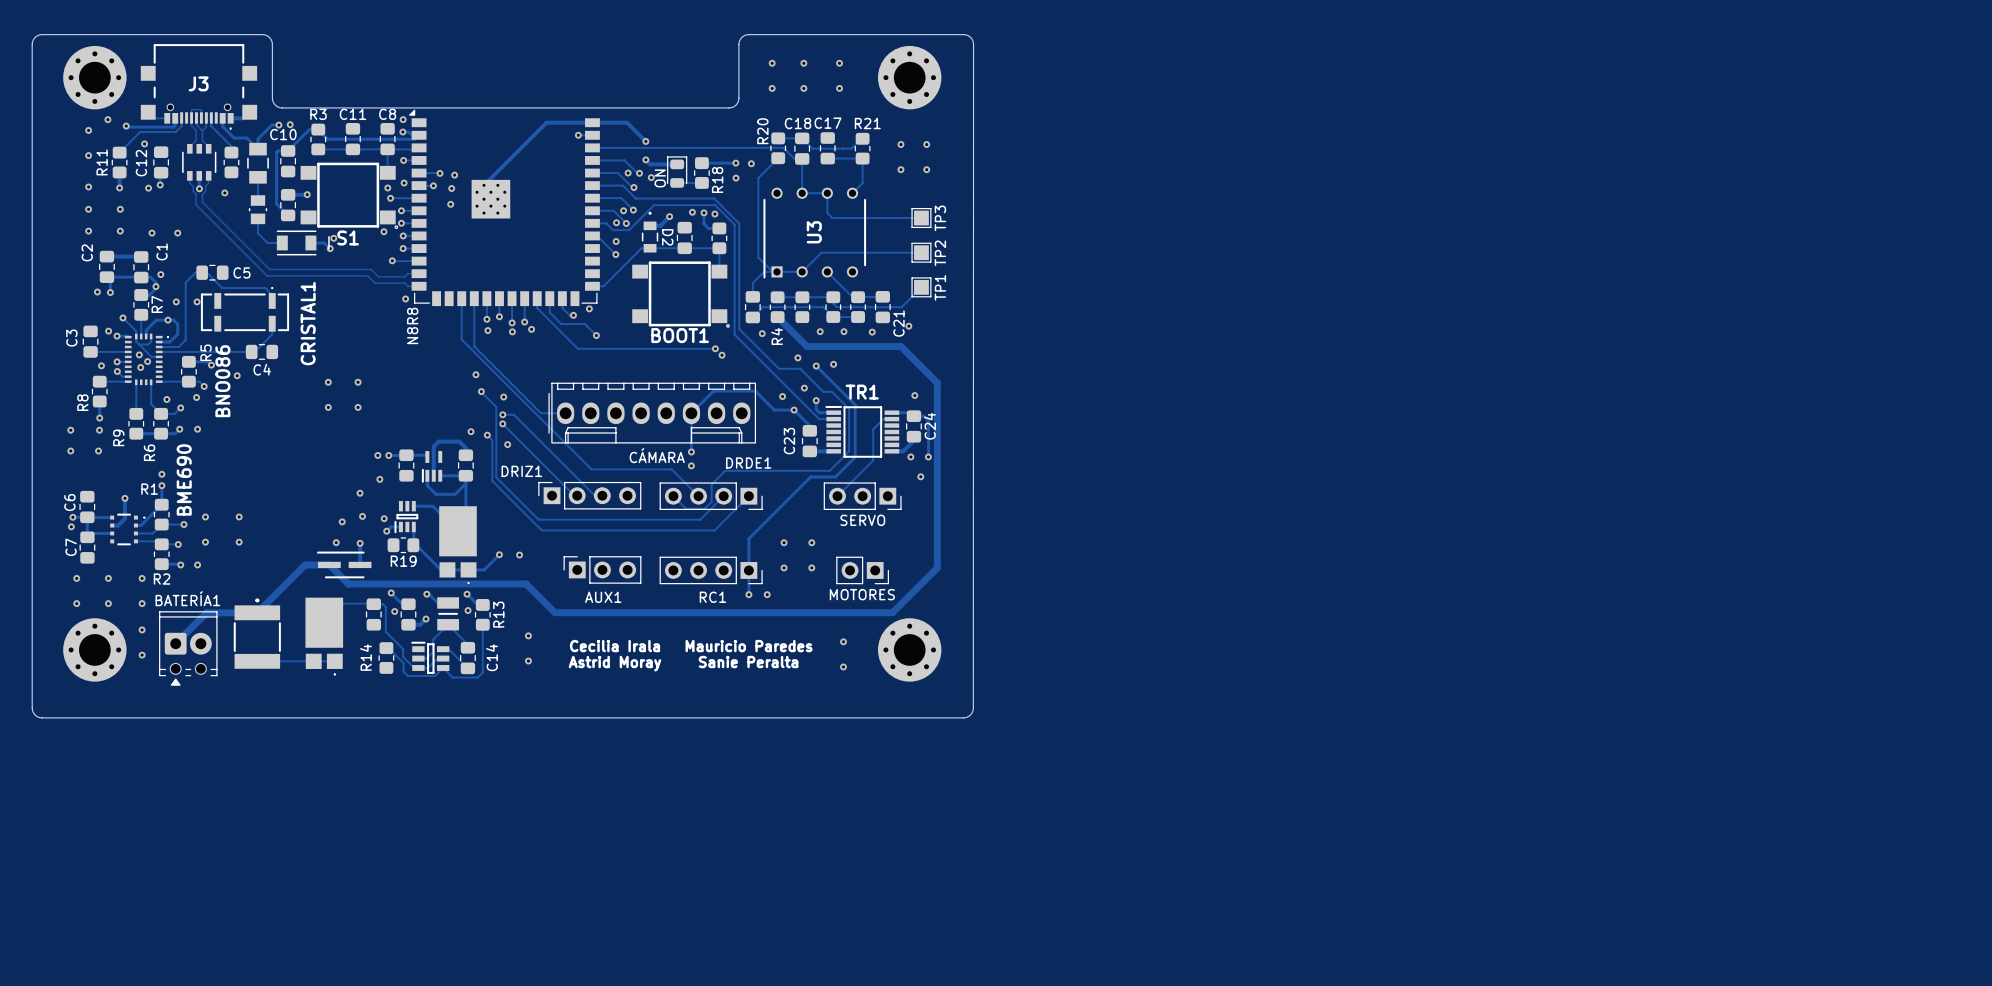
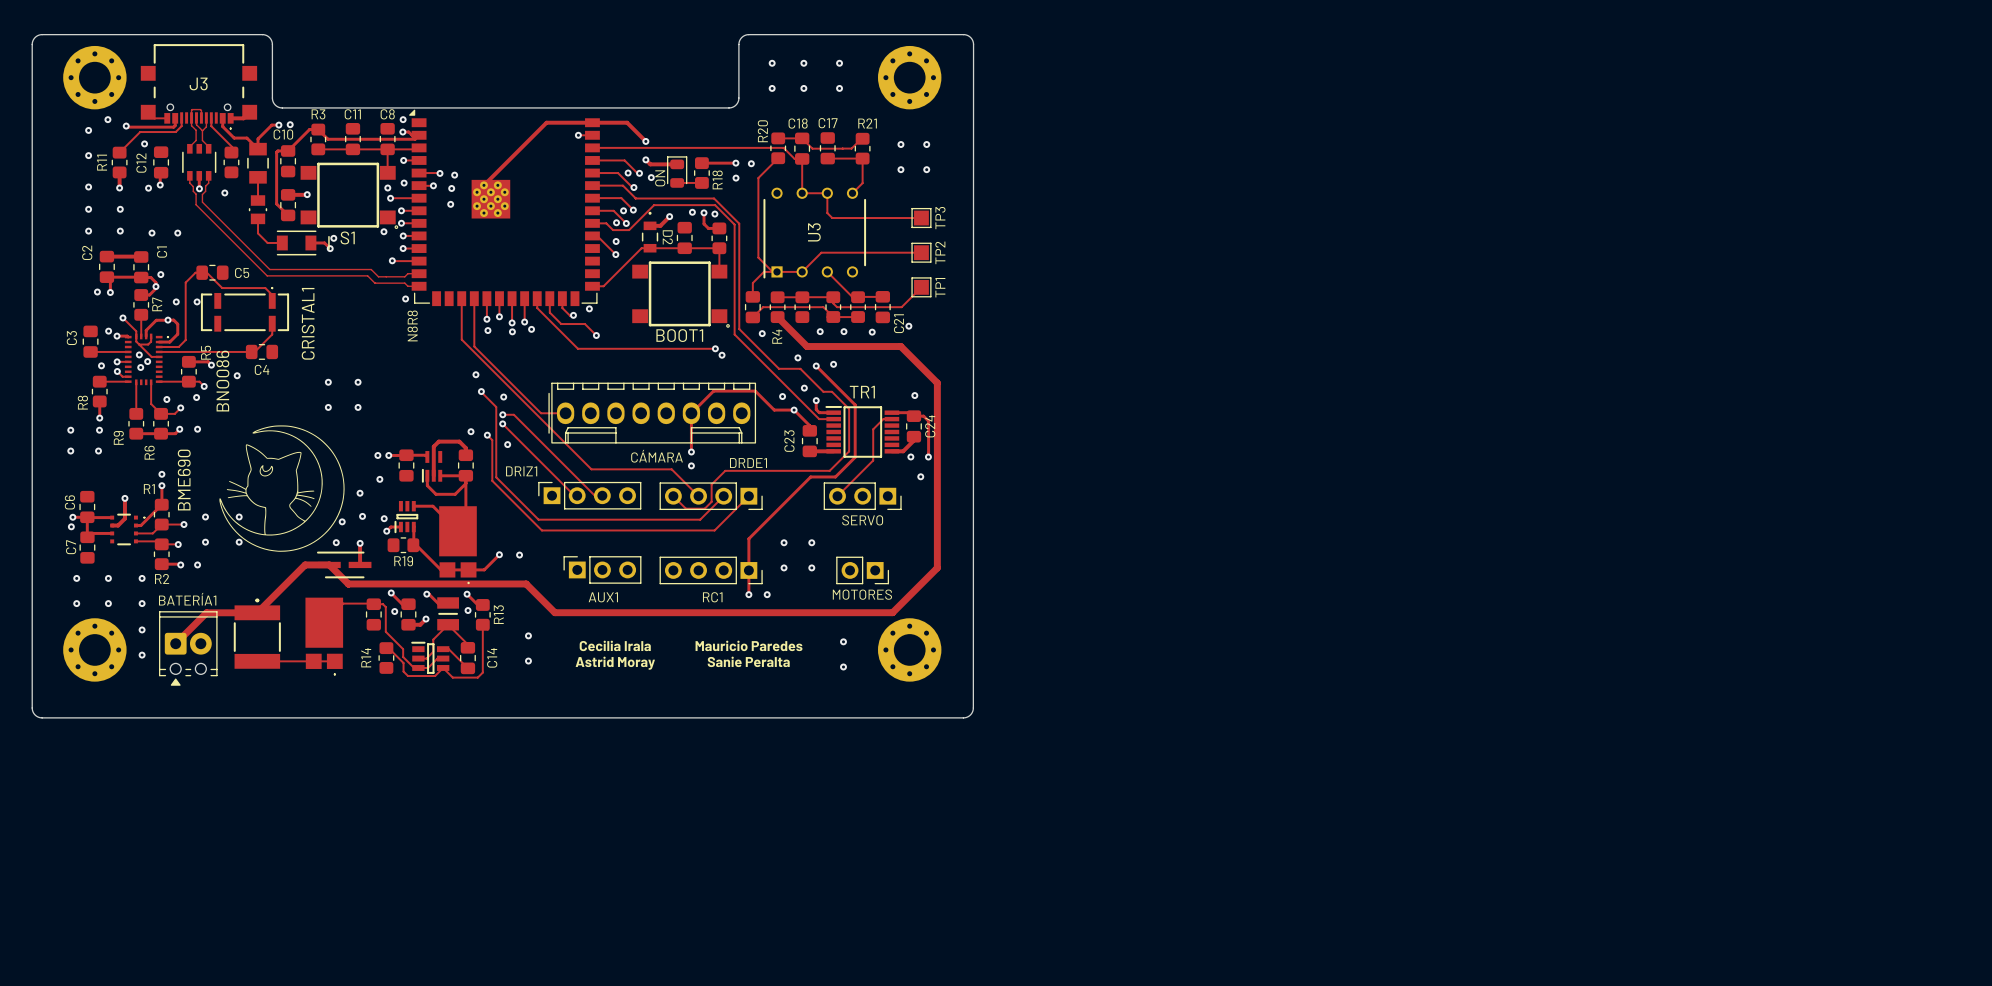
drawing: none -> [219, 425, 345, 552]

